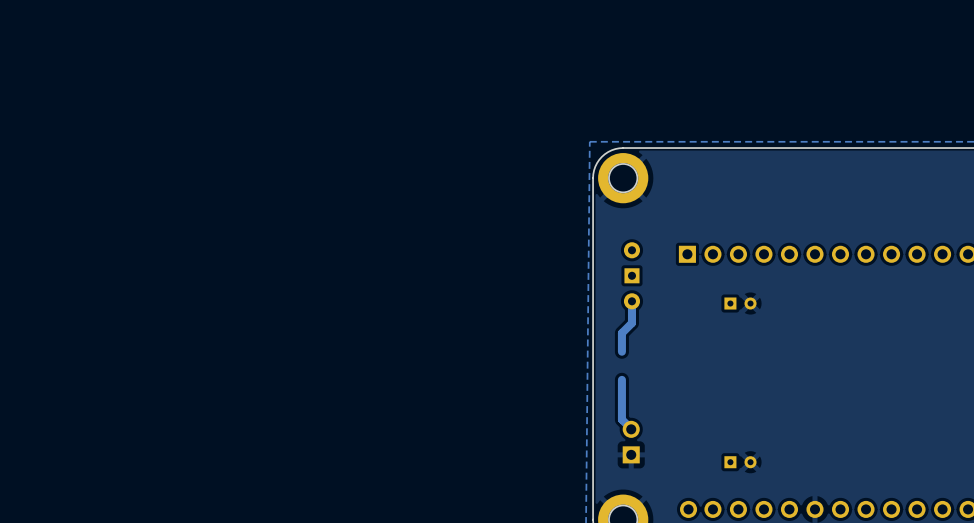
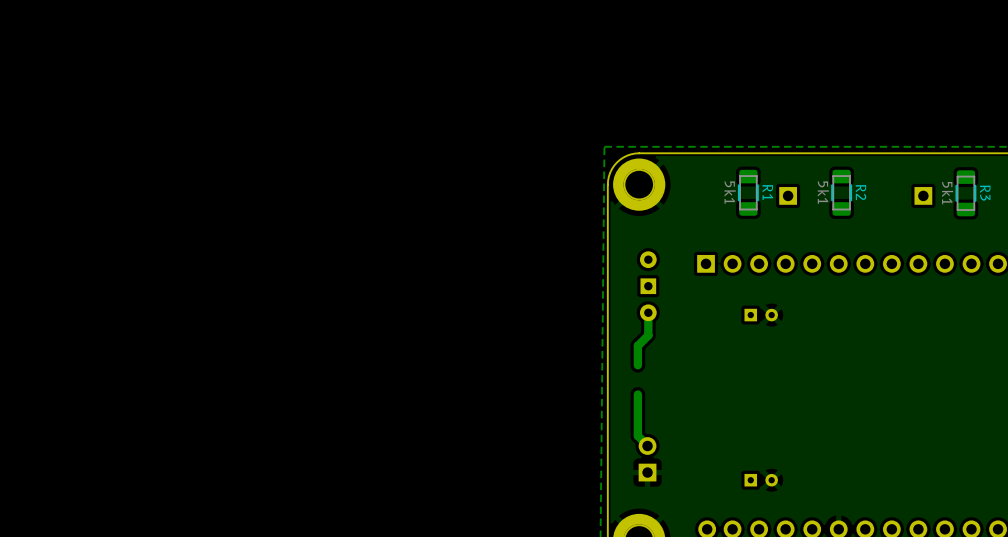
R1: none -> 5k1 (748, 192)
R2: none -> 5k1 (841, 192)
R3: none -> 5k1 (965, 193)
part: none -> (788, 195)
part: none -> (923, 195)

